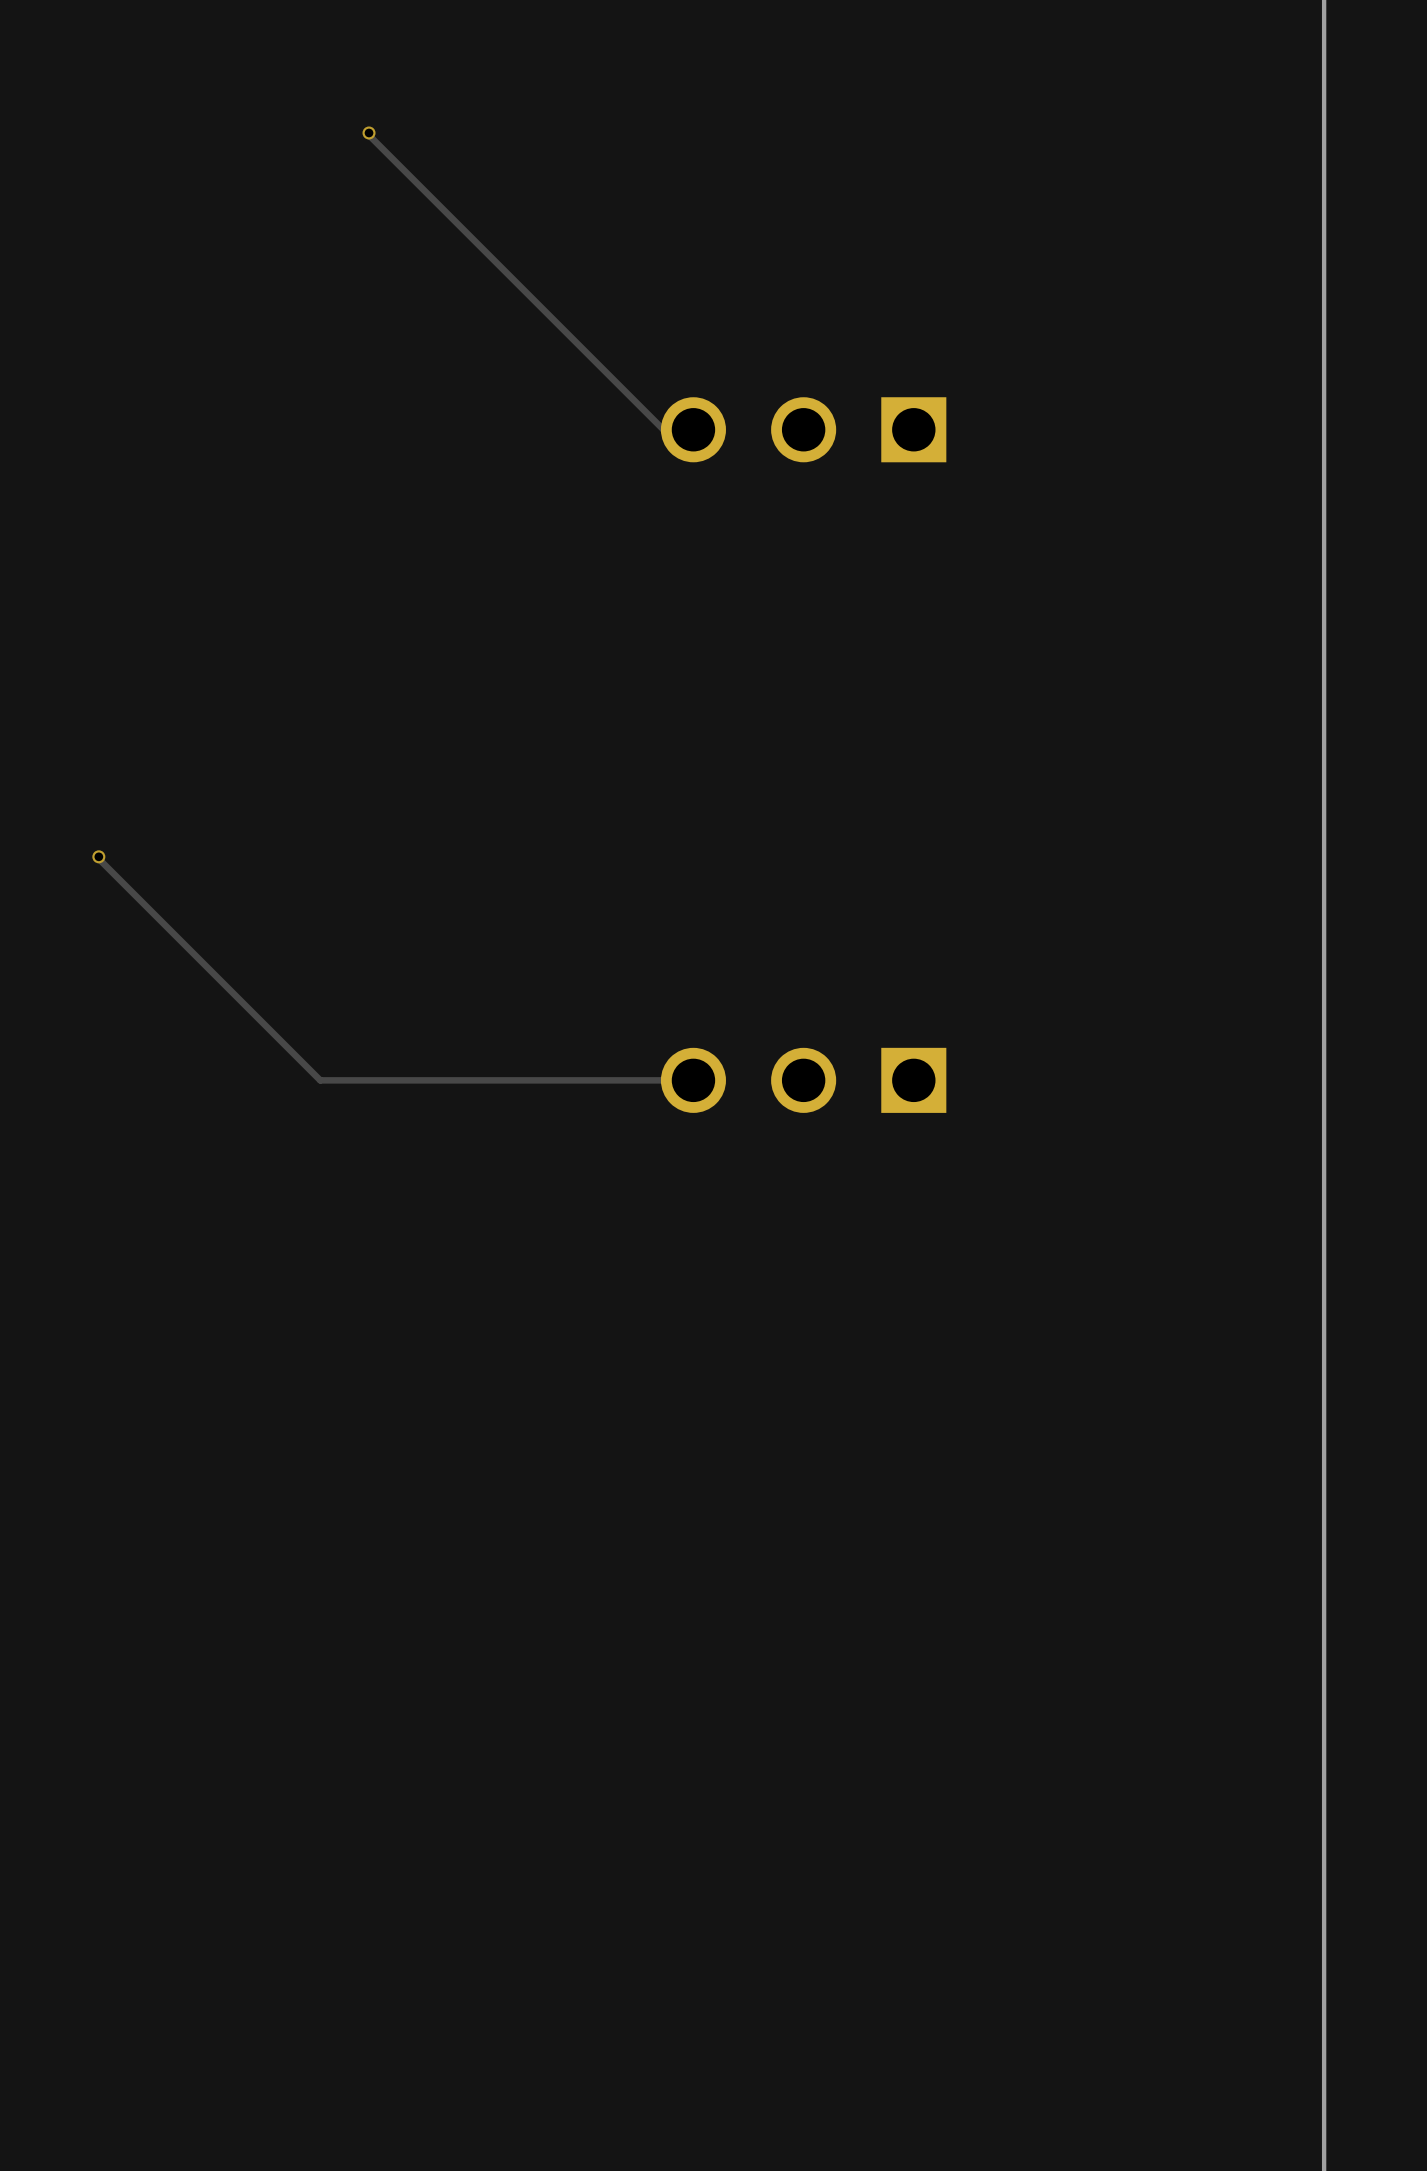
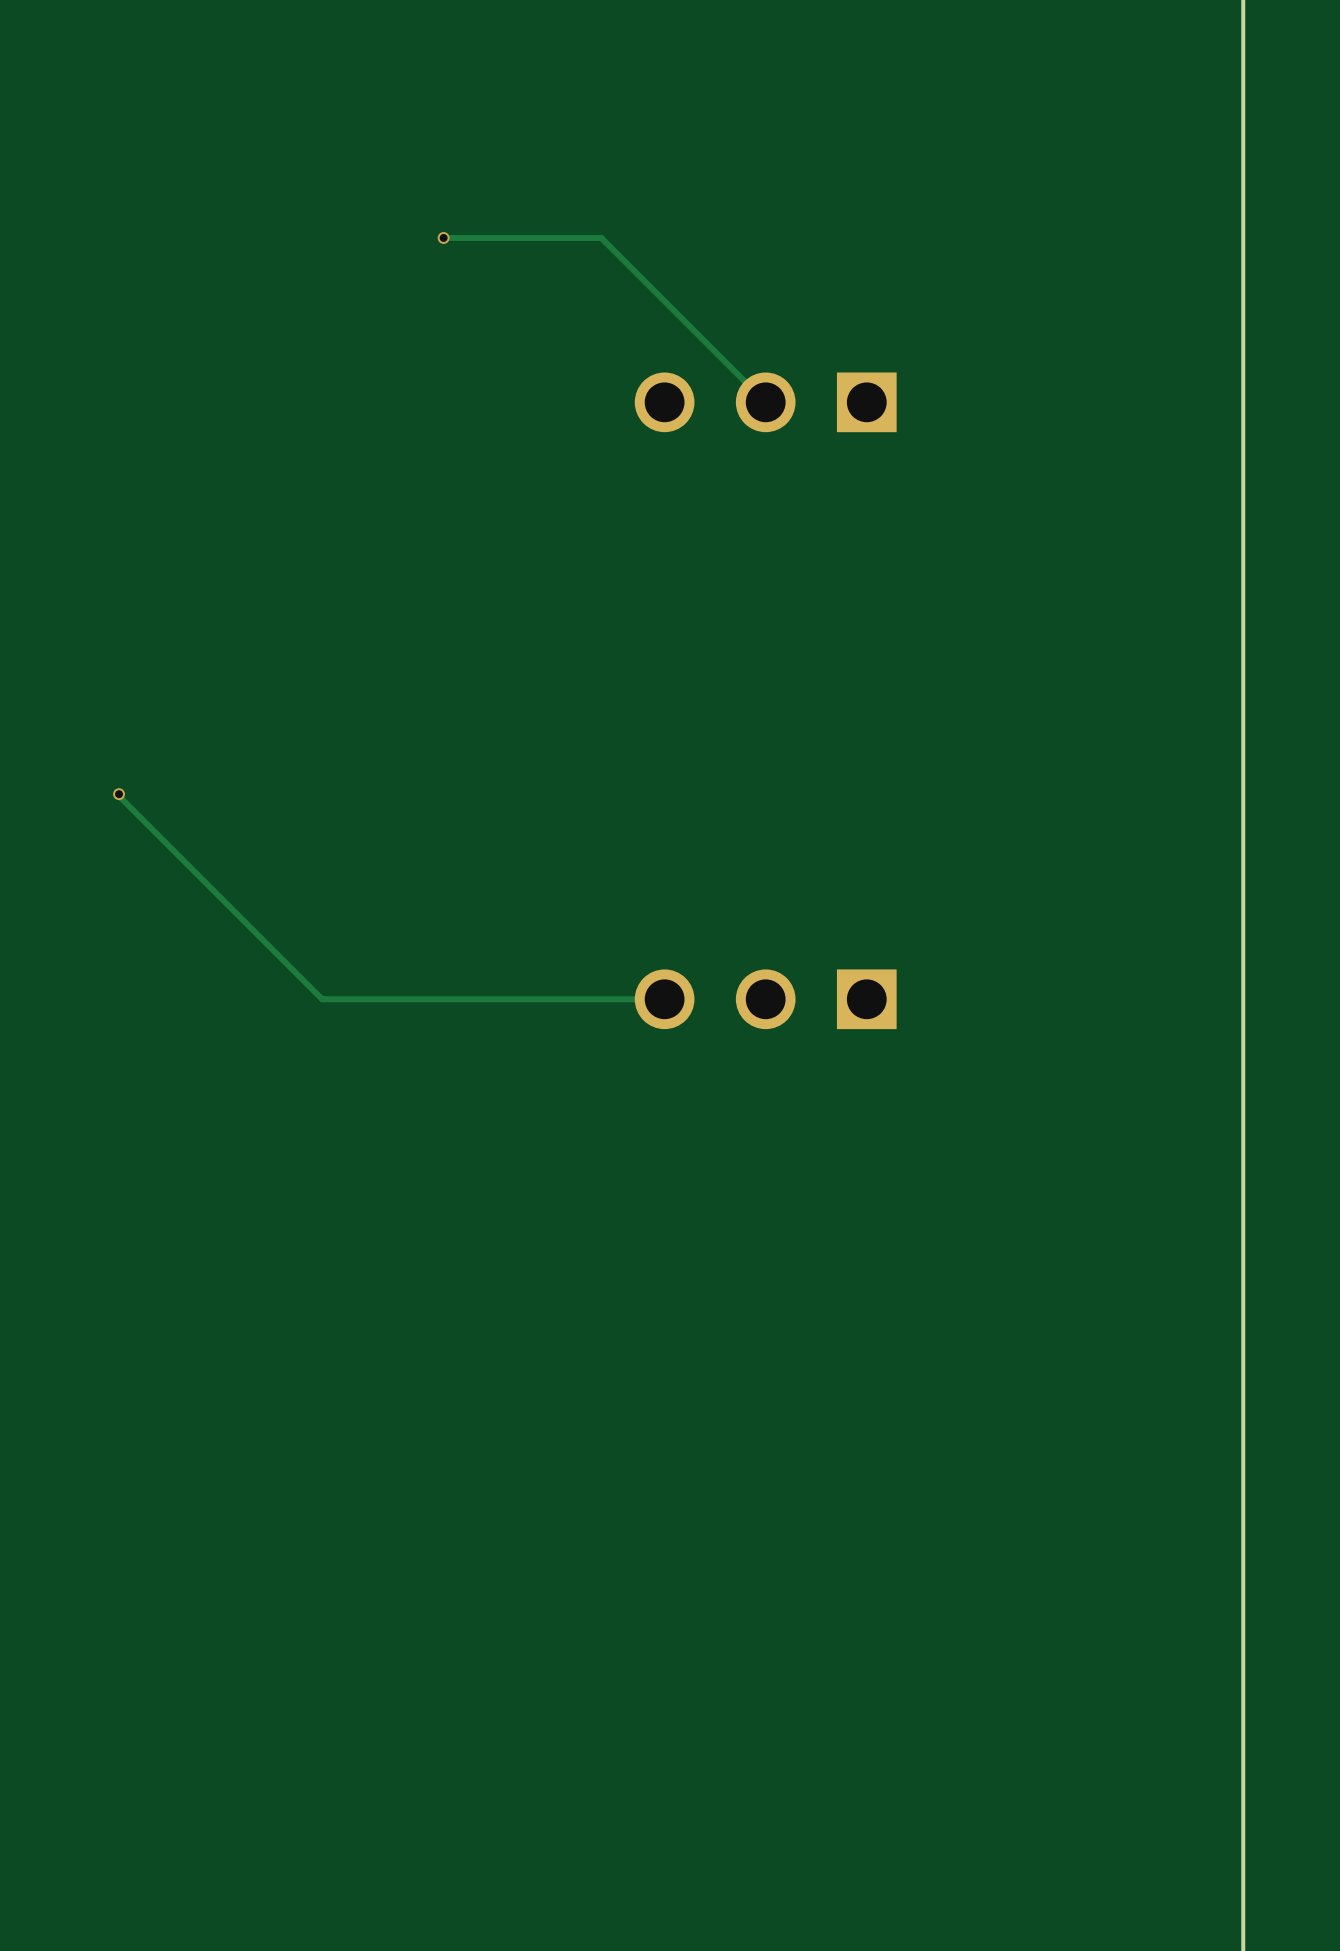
track: (369, 132) (370, 136) (663, 429) (693, 429) -> none
via position: (369, 132) -> (443, 237)
track: none -> (443, 237) (601, 237) (765, 402)

